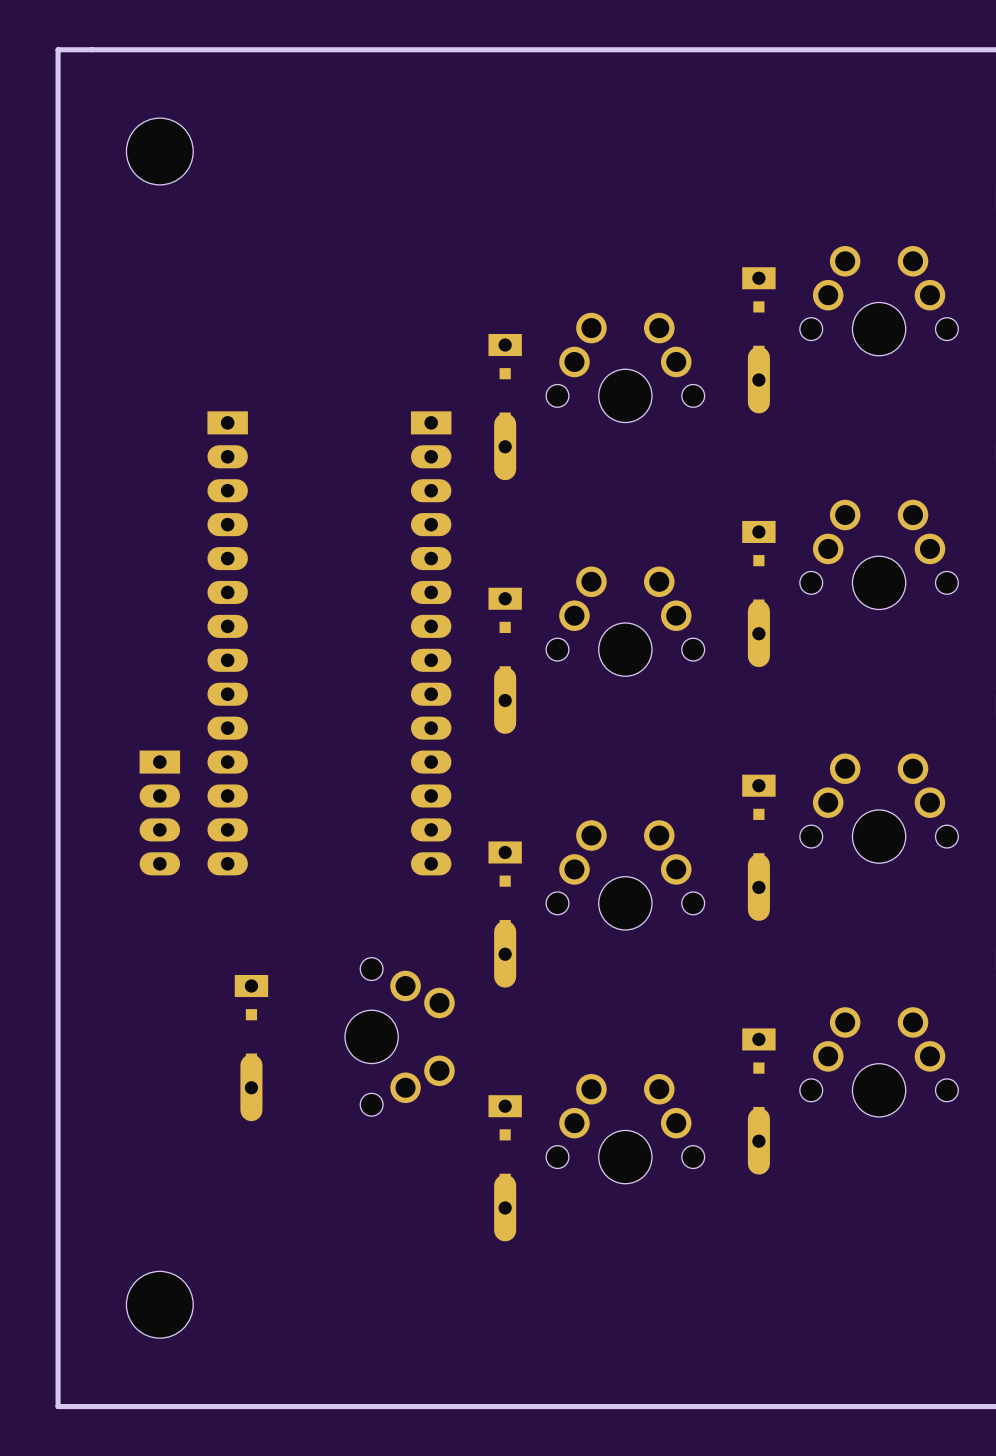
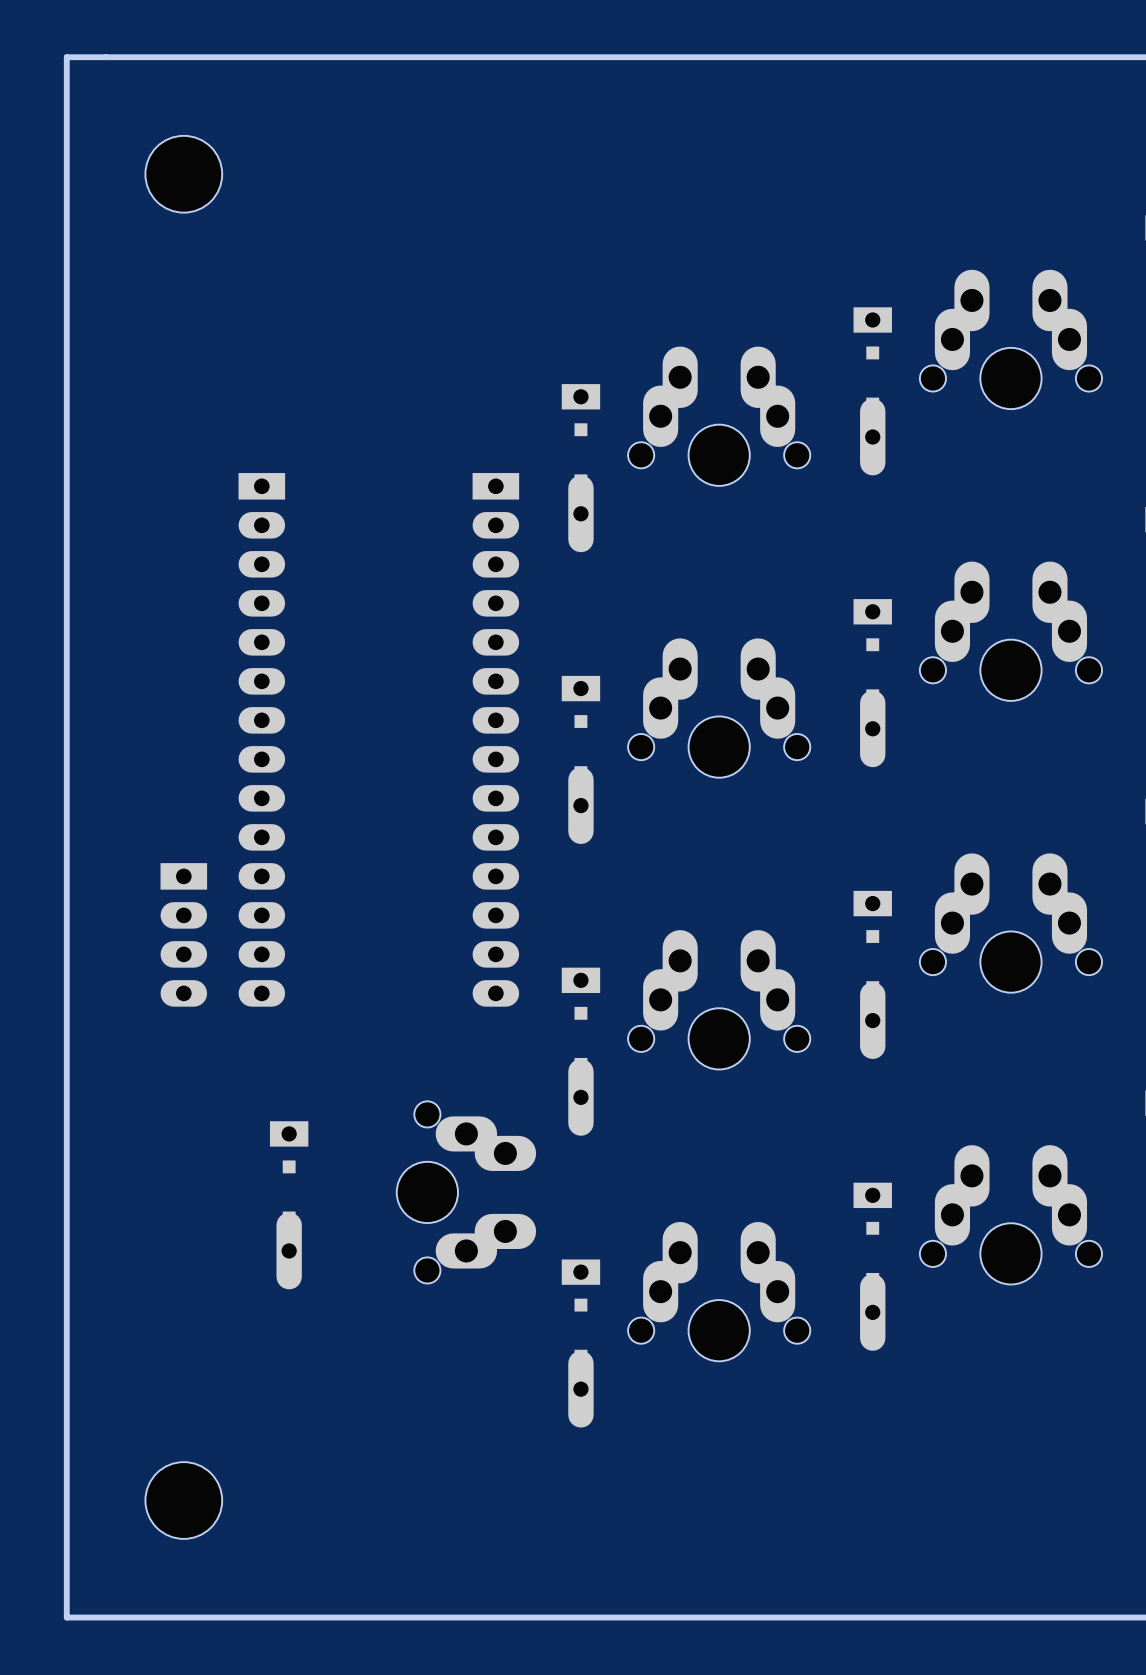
part footprint: [799, 246, 959, 356] -> [919, 269, 1103, 410]
part footprint: [546, 312, 705, 423] -> [628, 346, 811, 486]
part footprint: [799, 499, 959, 610] -> [919, 561, 1103, 701]
part footprint: [546, 566, 705, 677] -> [628, 638, 811, 778]
part footprint: [799, 753, 959, 864] -> [919, 853, 1103, 993]
part footprint: [546, 820, 705, 930] -> [628, 930, 811, 1070]
part footprint: [345, 957, 455, 1117] -> [396, 1101, 537, 1284]
part footprint: [799, 1007, 959, 1117] -> [919, 1145, 1103, 1285]
part footprint: [546, 1073, 705, 1184] -> [628, 1221, 811, 1362]

